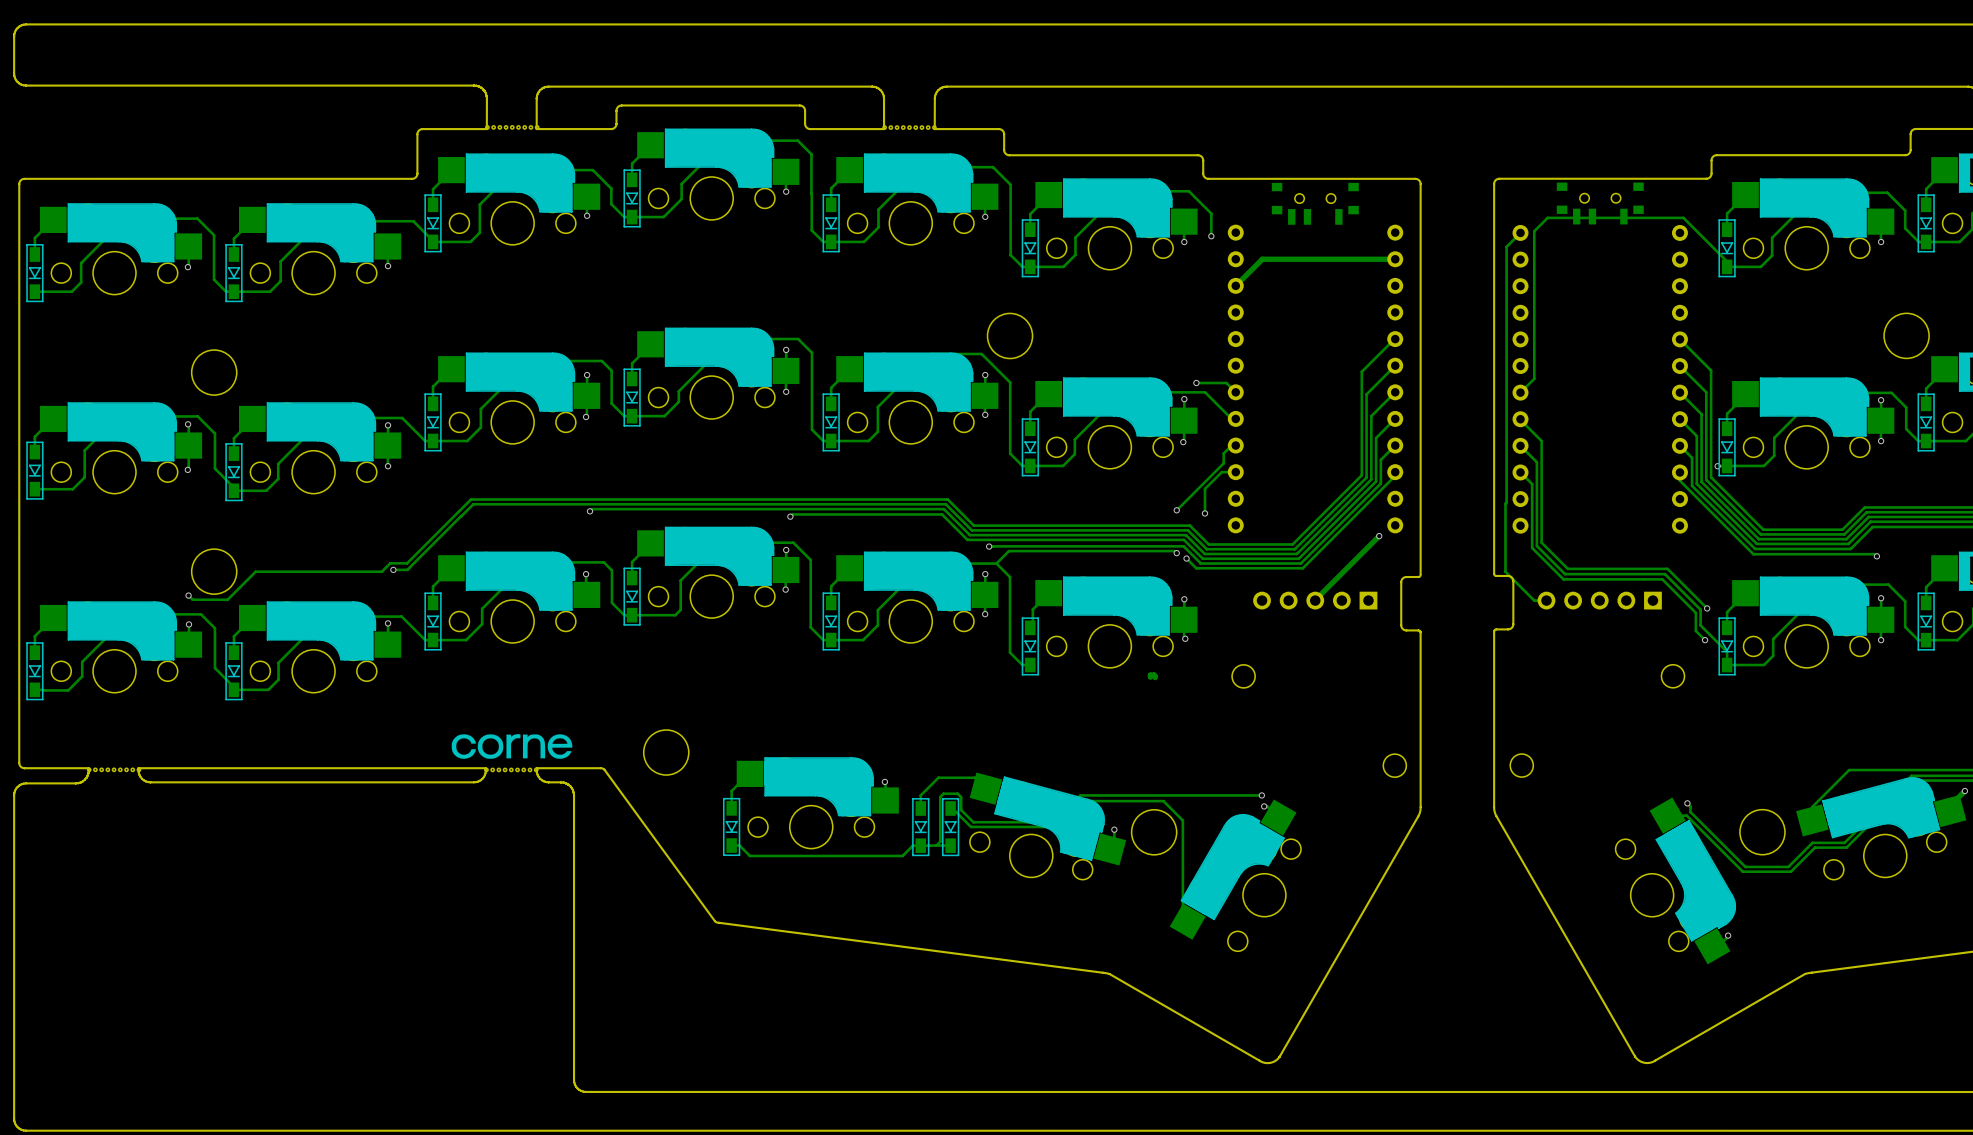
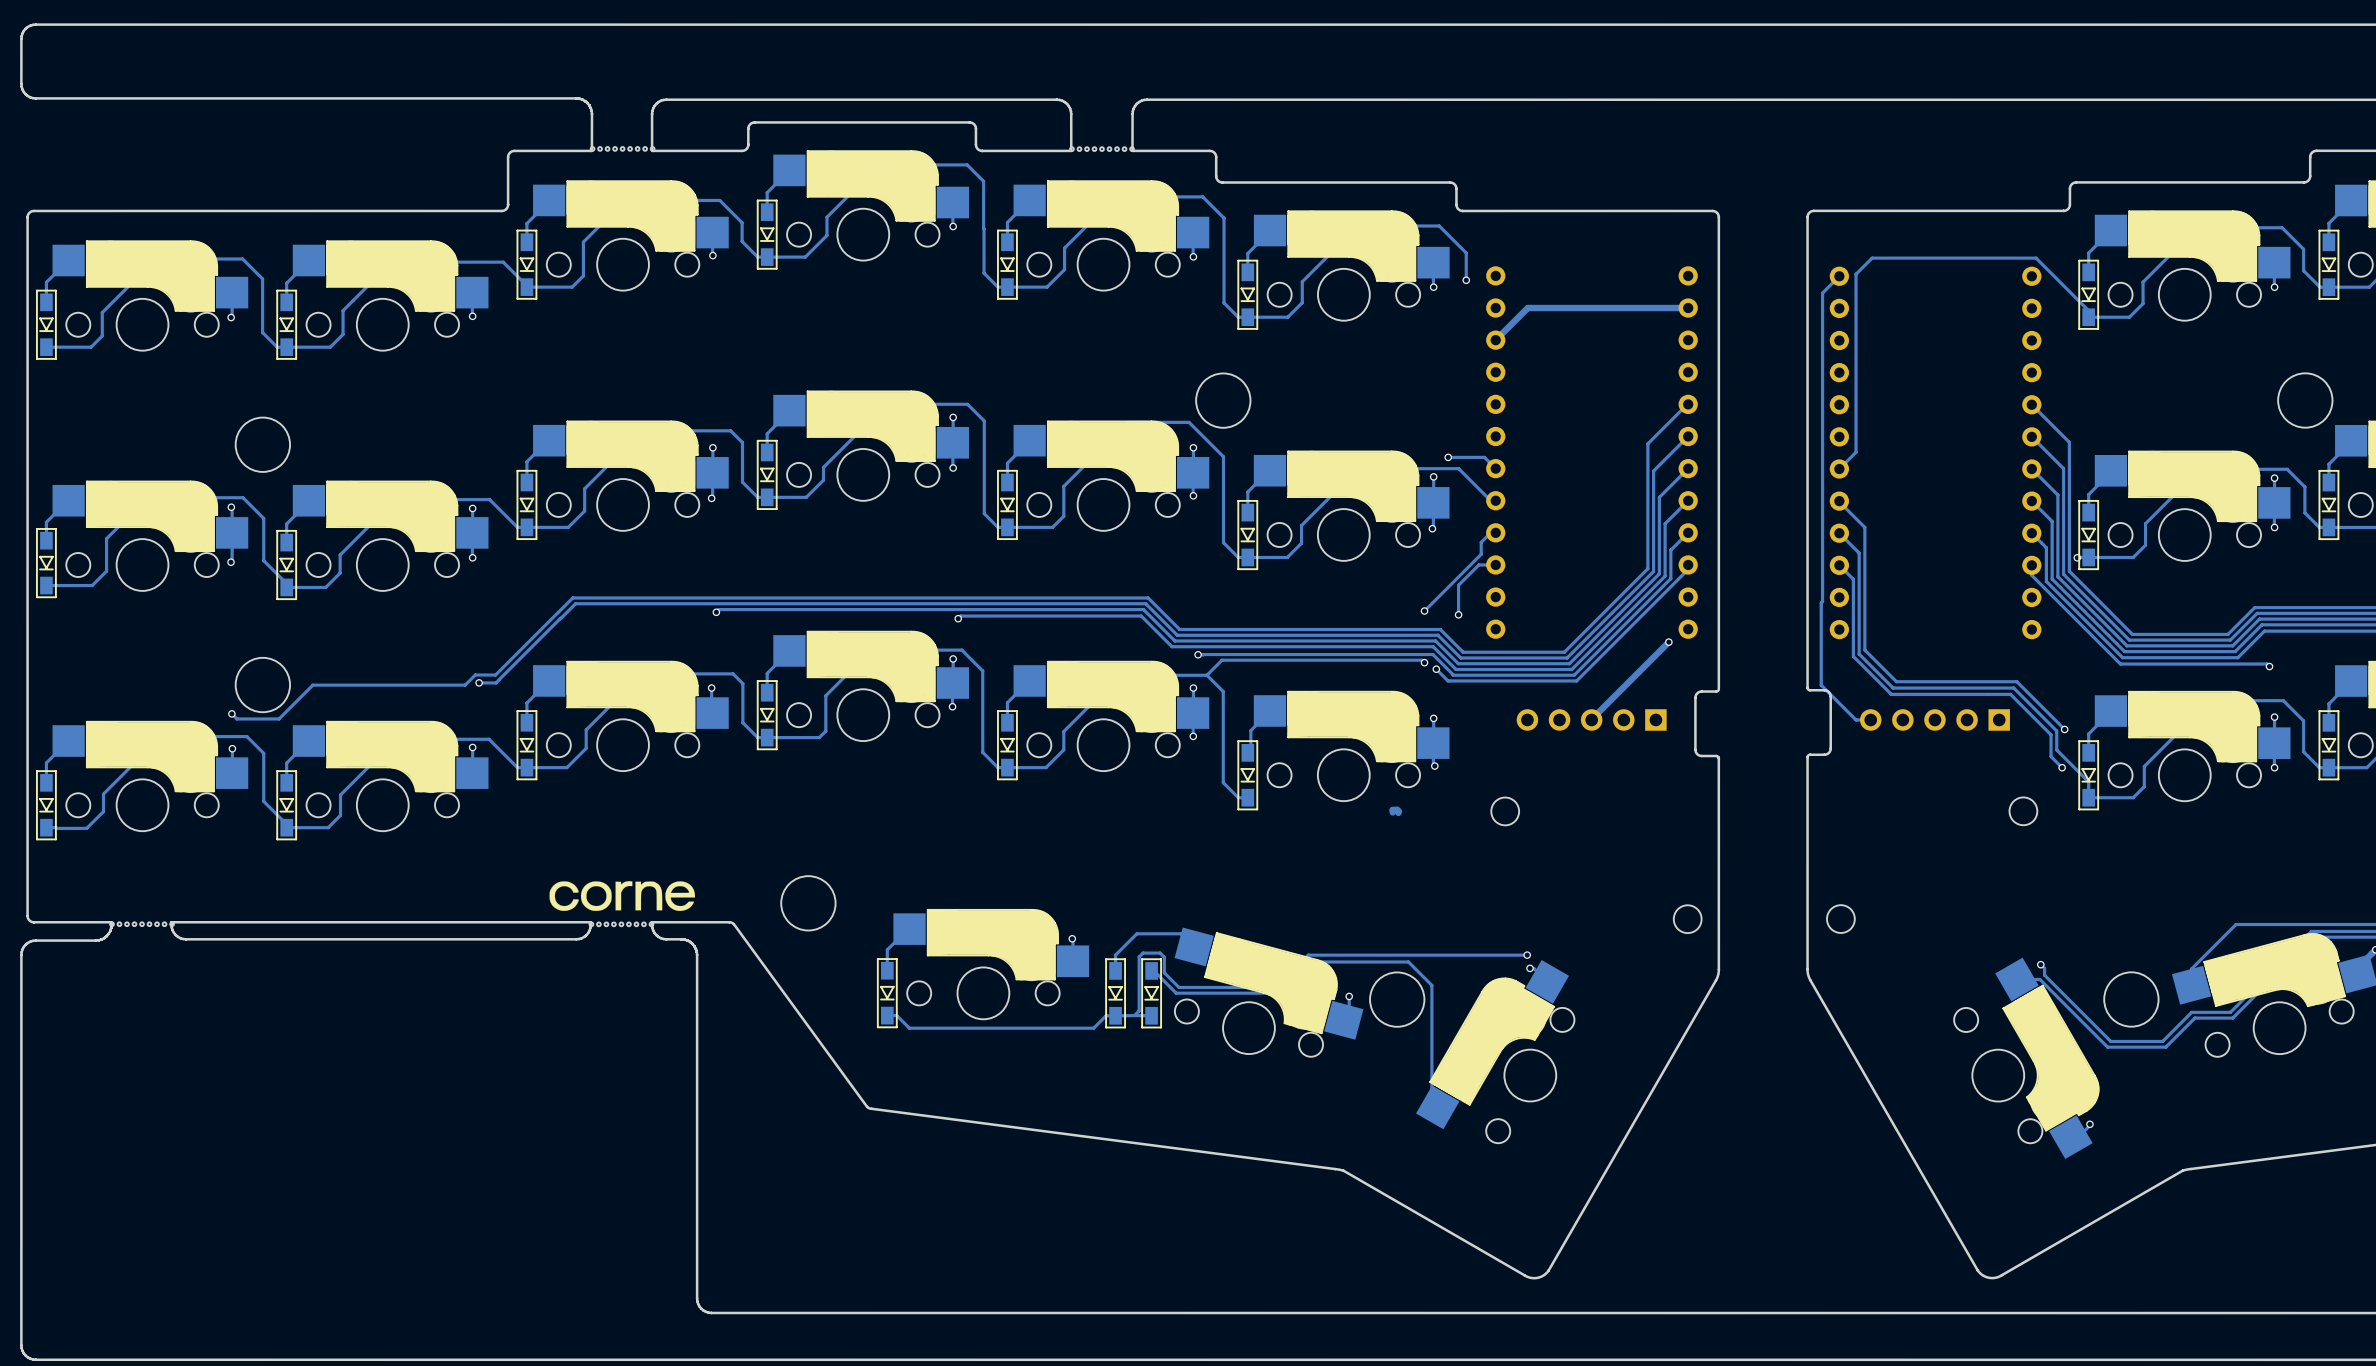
part: (1315, 203) -> none
part: (1600, 203) -> none

